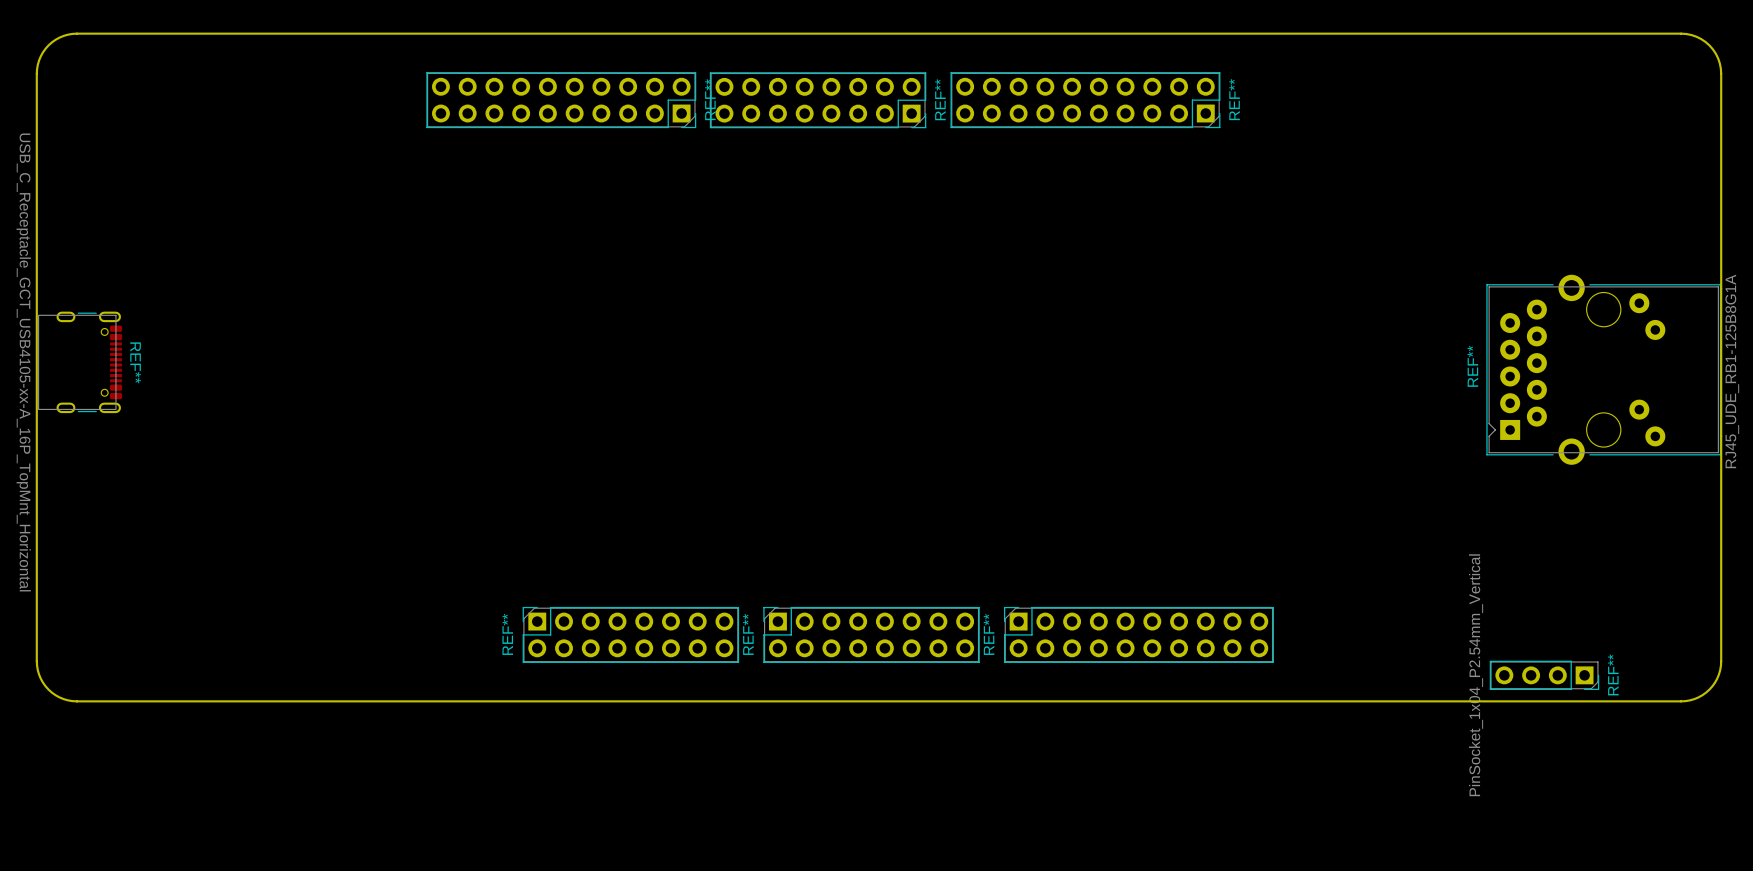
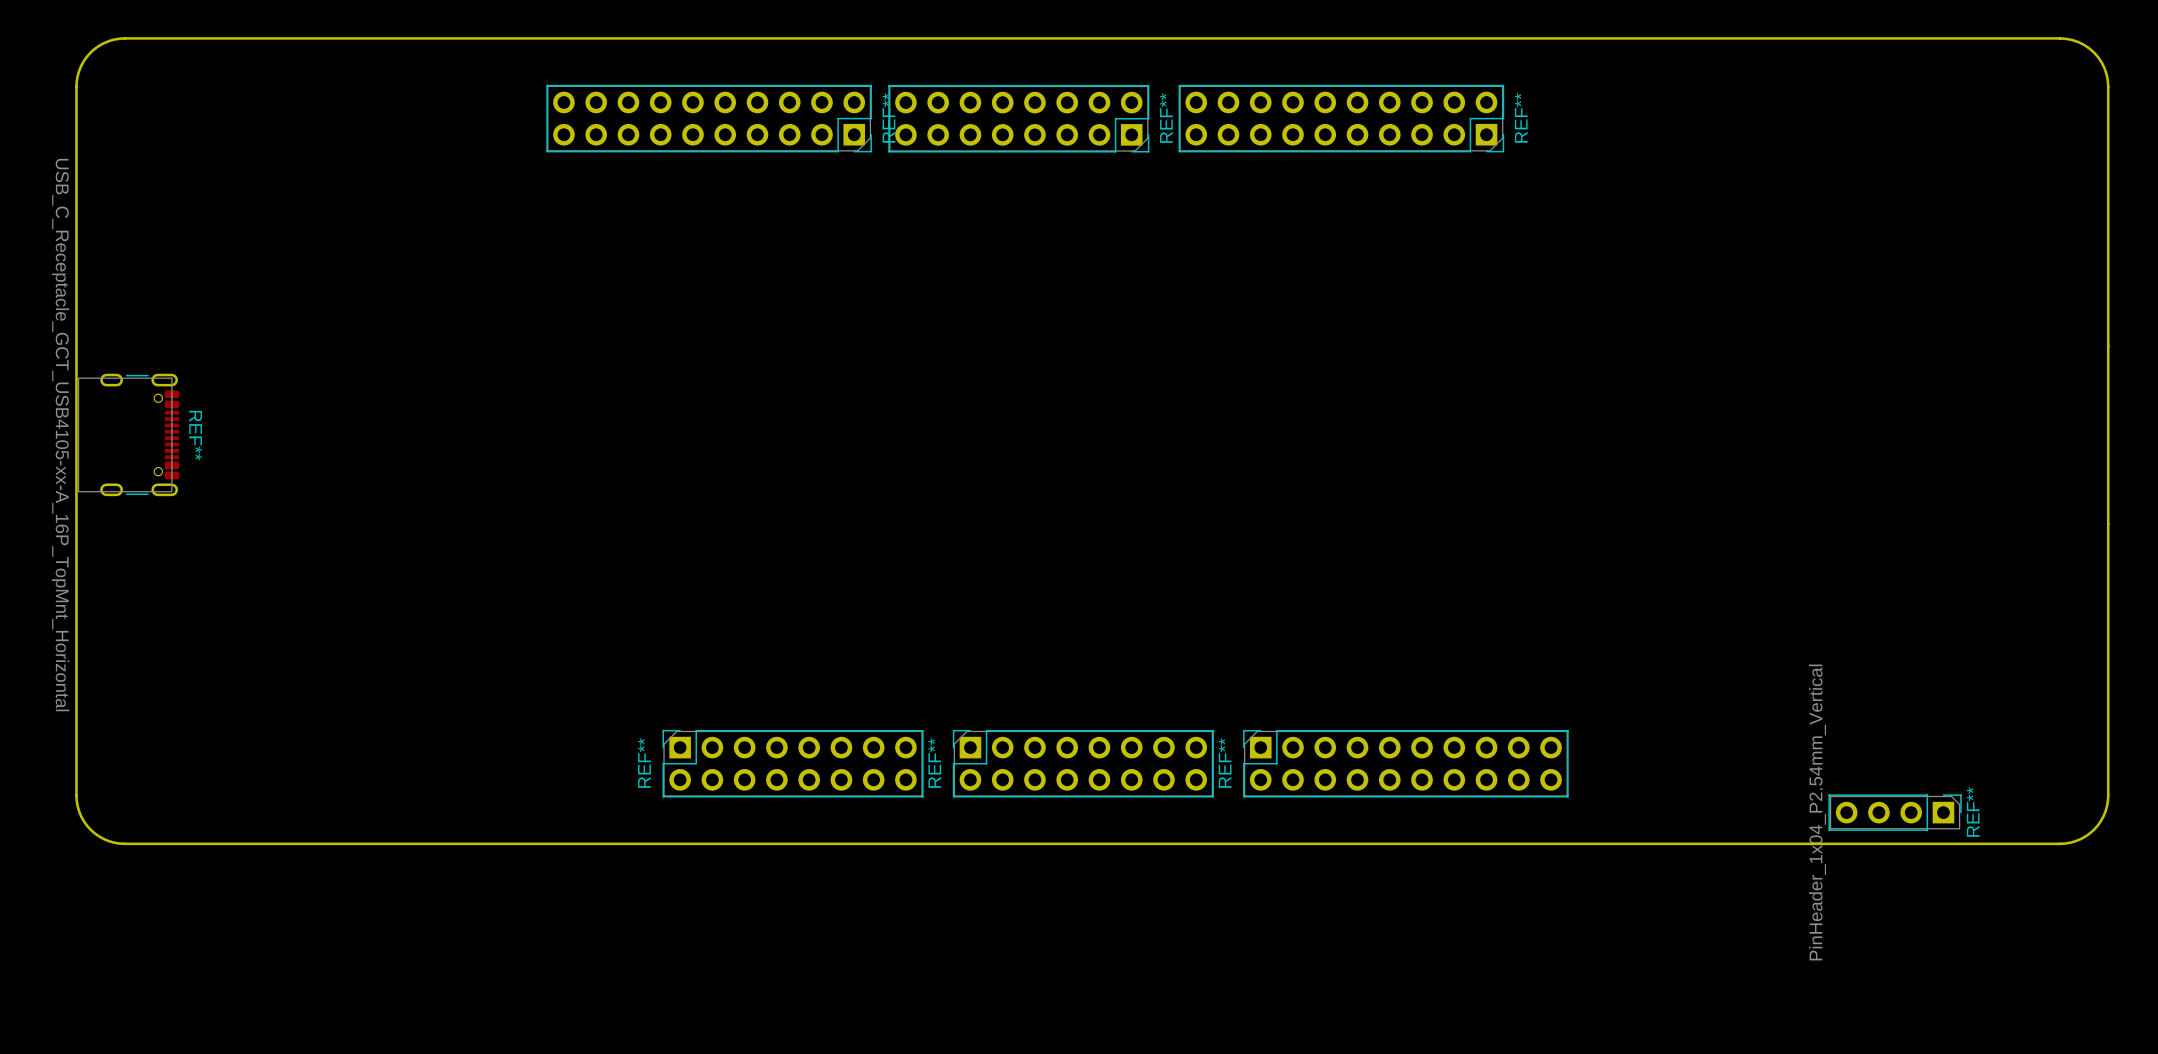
REF**: RJ45_UDE_RB1-125B8G1A (1603, 369) -> none
REF** footprint: [1489, 660, 1600, 691] -> [1828, 794, 1962, 831]
REF** value: PinSocket_1x04_P2.54mm_Vertical (1476, 675) -> PinHeader_1x04_P2.54mm_Vertical (1817, 812)

